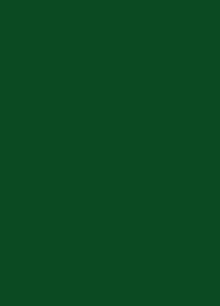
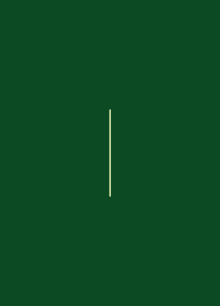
board edge: none -> (110, 110) (110, 195)

